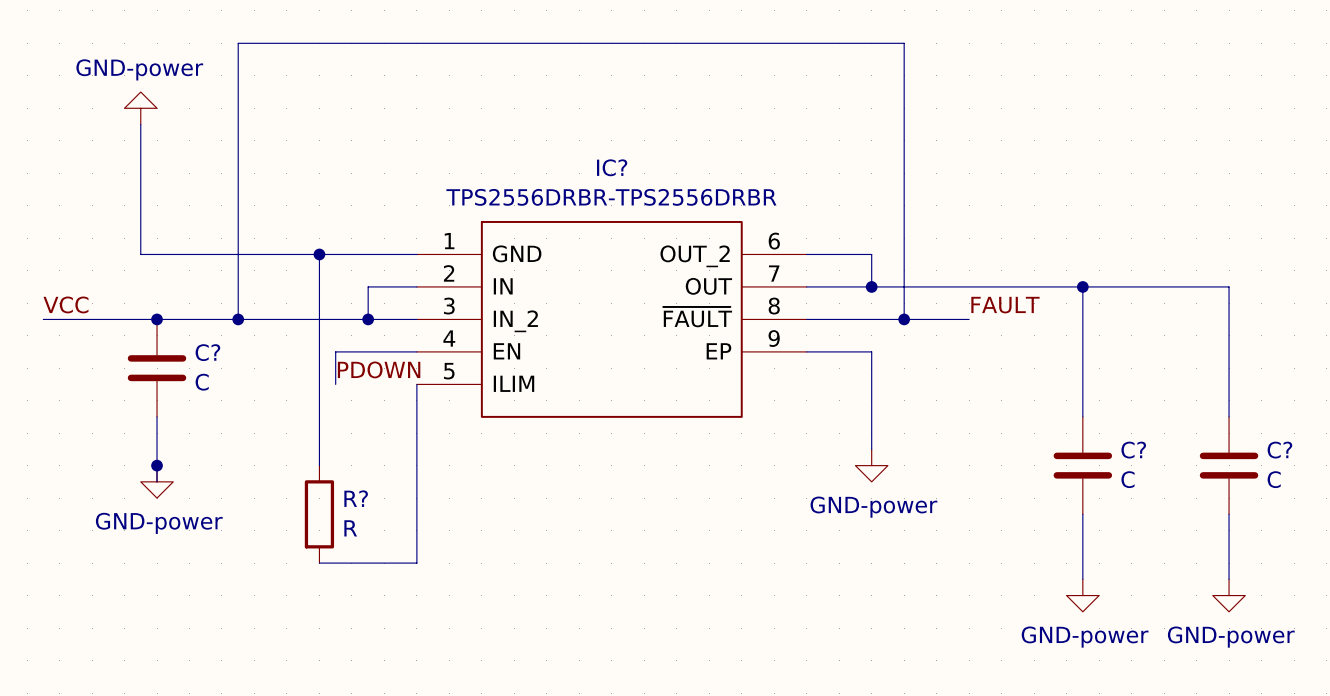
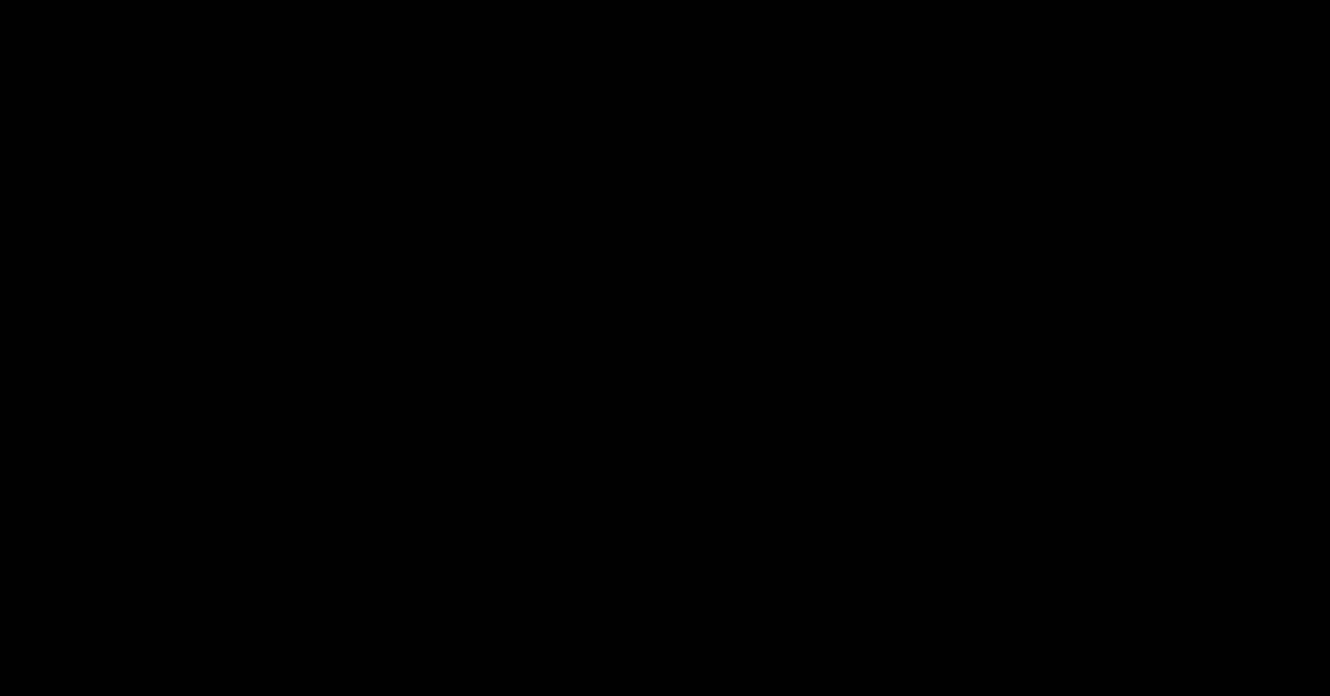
power symbol: GND-power (140, 108) -> none
wire: (140, 124) (140, 254) (416, 254) -> none
wire: (319, 254) (319, 465) -> none
junction: (319, 254) -> none
wire: (806, 254) (871, 254) (871, 286) -> none
wire: (416, 286) (368, 286) (368, 319) -> none
wire: (806, 286) (1229, 286) (1229, 416) -> none
junction: (871, 286) -> none
wire: (1082, 286) (1082, 416) -> none
junction: (1082, 286) -> none
label: VCC (65, 304) -> none
label: FAULT (1005, 305) -> none
wire: (43, 319) (416, 319) -> none
junction: (157, 319) -> none
wire: (238, 319) (238, 43) (904, 43) (904, 319) -> none
junction: (238, 319) -> none
junction: (368, 319) -> none
IC?: TPS2556DRBR-TPS2556DRBR (611, 319) -> none
wire: (806, 319) (969, 319) -> none
junction: (904, 319) -> none
wire: (416, 351) (335, 351) (335, 384) -> none
wire: (806, 351) (871, 351) (871, 449) -> none
C?: C (157, 368) -> none
label: PDOWN (379, 369) -> none
wire: (416, 384) (416, 563) (319, 563) -> none
wire: (157, 416) (157, 481) -> none
junction: (157, 465) -> none
power symbol: GND-power (871, 465) -> none
C?: C (1082, 465) -> none
C?: C (1229, 465) -> none
power symbol: GND-power (157, 481) -> none
R?: R (319, 514) -> none
wire: (1082, 514) (1082, 579) -> none
wire: (1229, 514) (1229, 579) -> none
power symbol: GND-power (1082, 595) -> none
power symbol: GND-power (1229, 595) -> none

